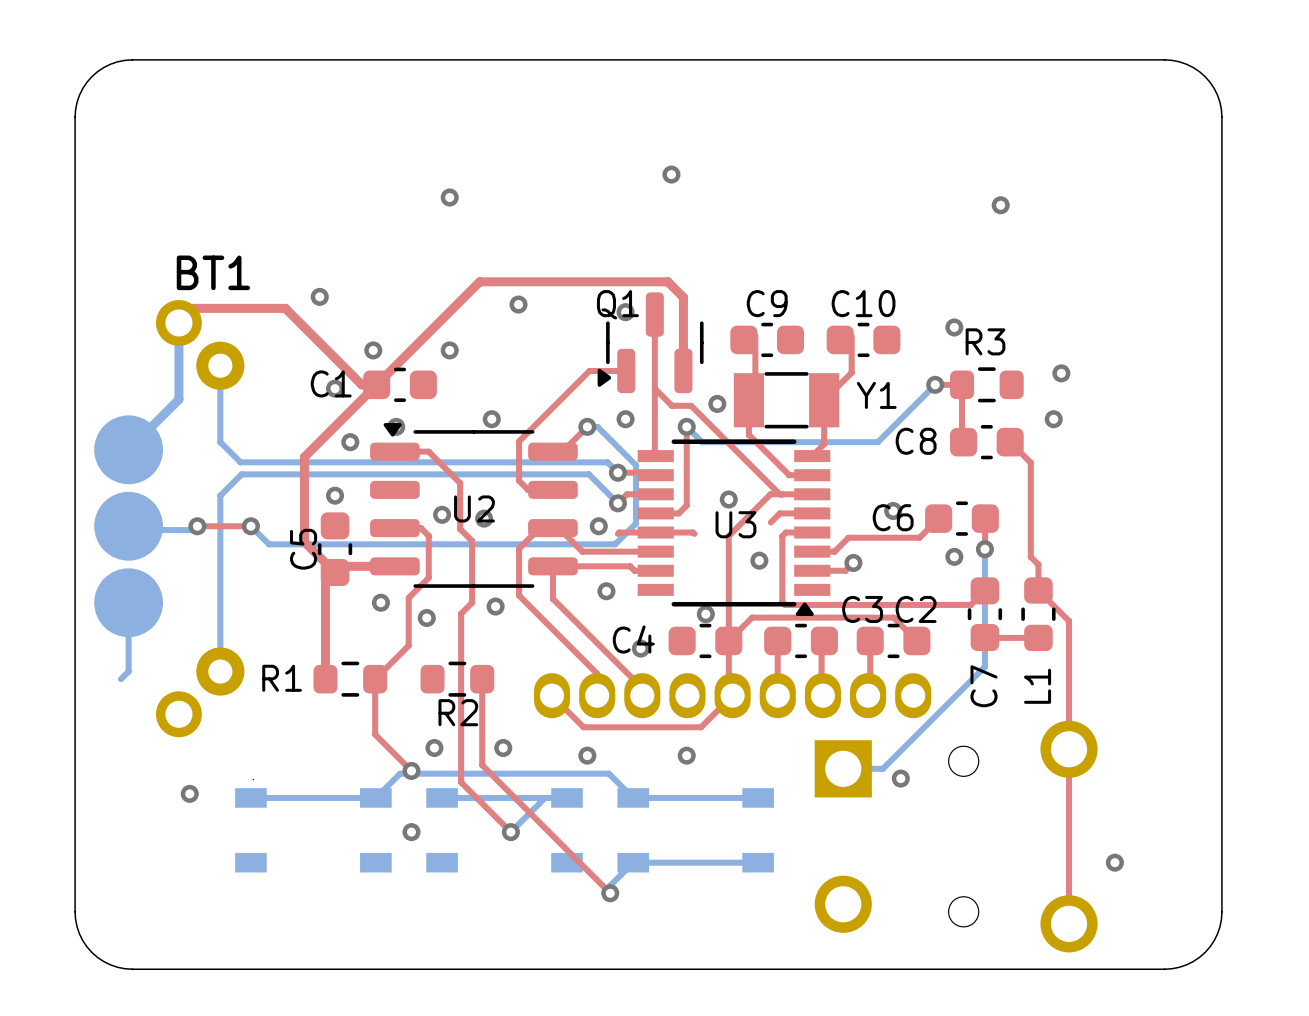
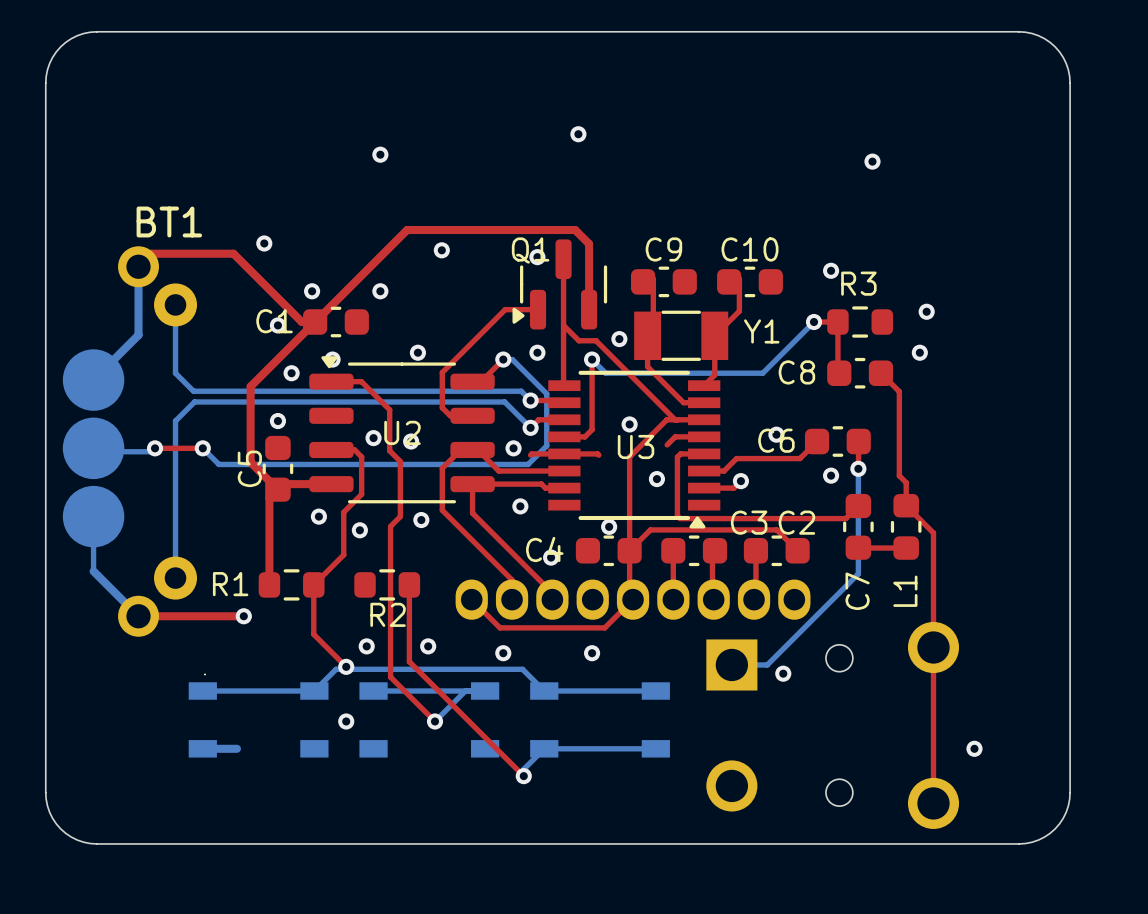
bottom track: (128, 663) (128, 671) (120, 679) -> (93, 571) (138, 616)
top track: none -> (138, 616) (243, 616)
via position: (189, 793) -> (243, 616)
bottom track: none -> (202, 748) (236, 748)

